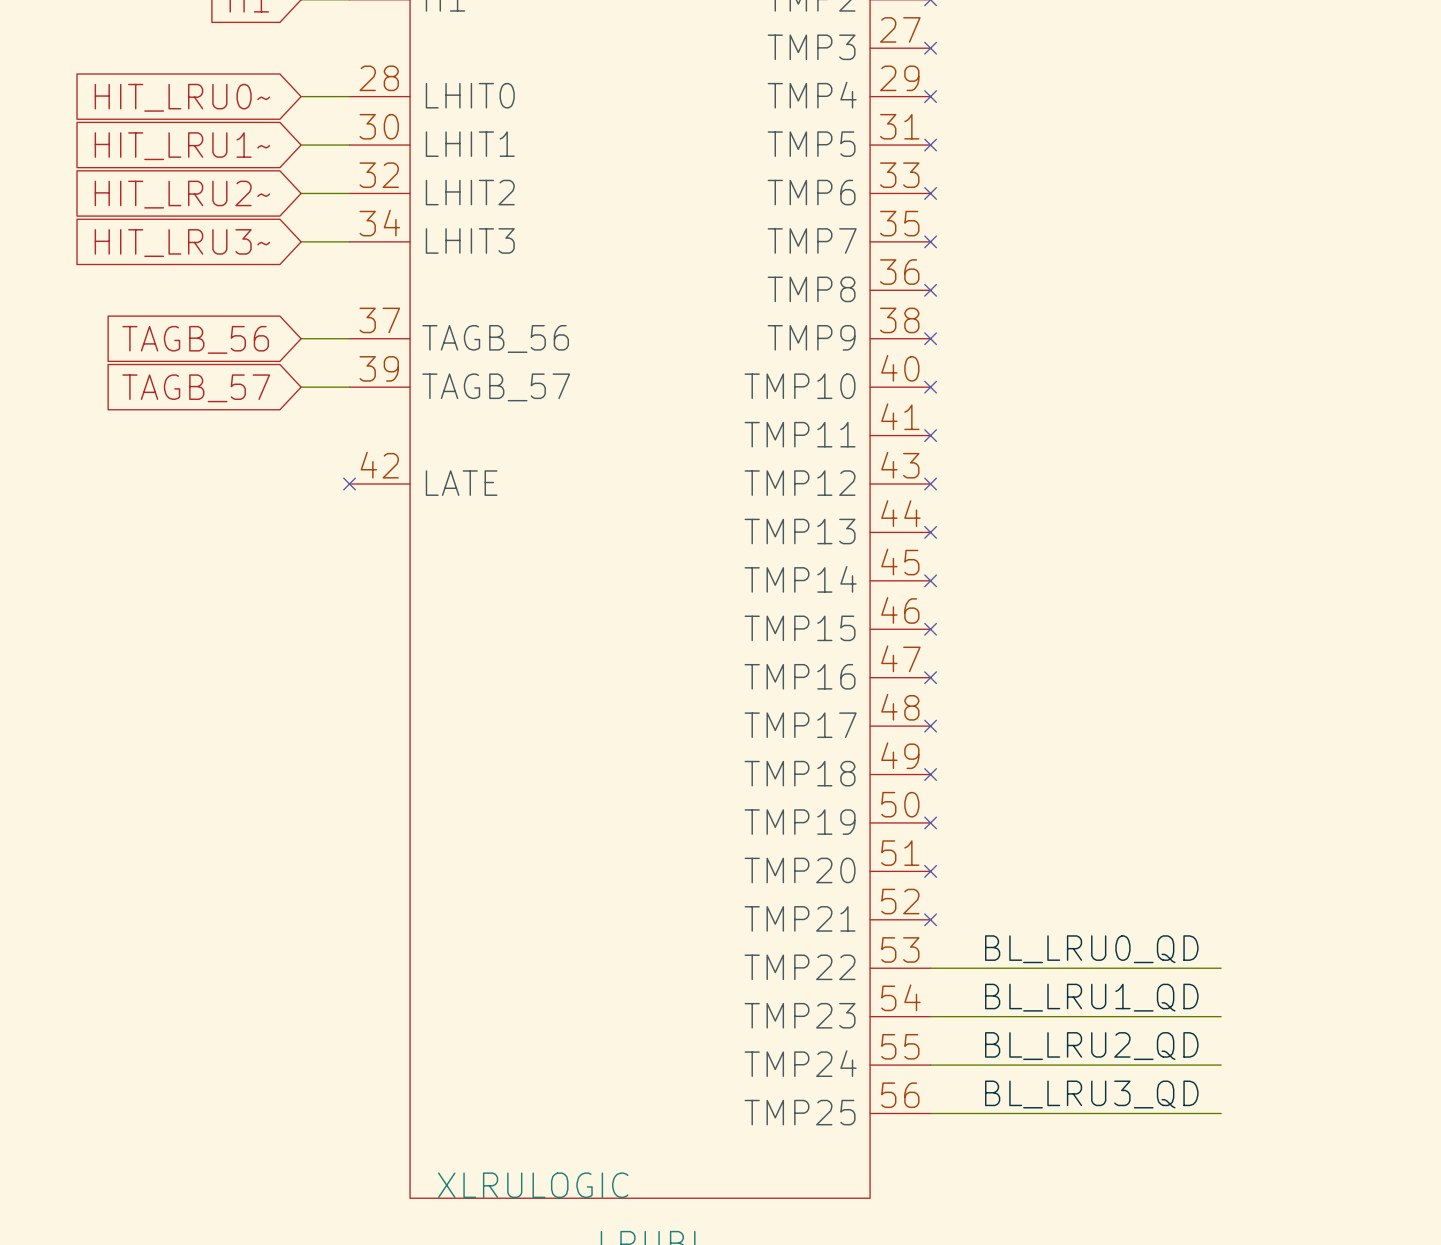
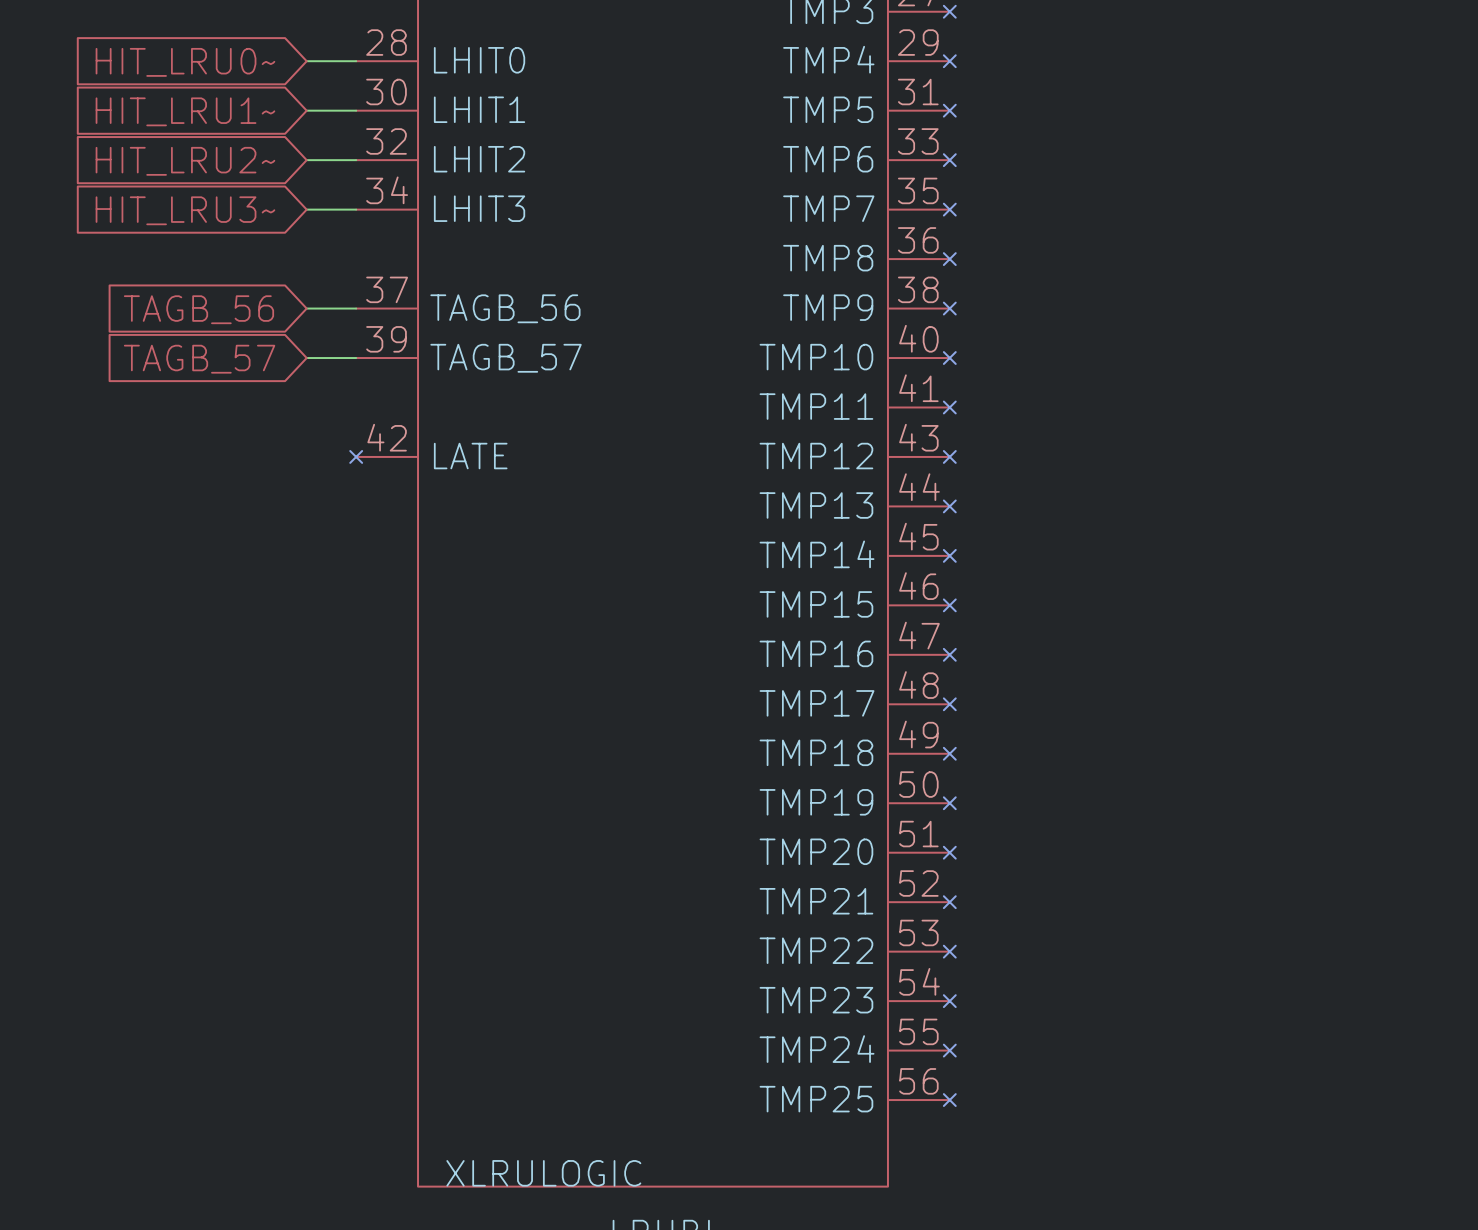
label: BL_LRU0_QD (1091, 949) -> none
wire: (930, 968) (1221, 968) -> none
no-connect mark: none -> (949, 951)
label: BL_LRU1_QD (1091, 997) -> none
wire: (930, 1016) (1221, 1016) -> none
no-connect mark: none -> (949, 1001)
label: BL_LRU2_QD (1091, 1046) -> none
wire: (930, 1065) (1221, 1065) -> none
no-connect mark: none -> (949, 1050)
label: BL_LRU3_QD (1091, 1094) -> none
wire: (930, 1113) (1221, 1113) -> none
no-connect mark: none -> (949, 1100)

